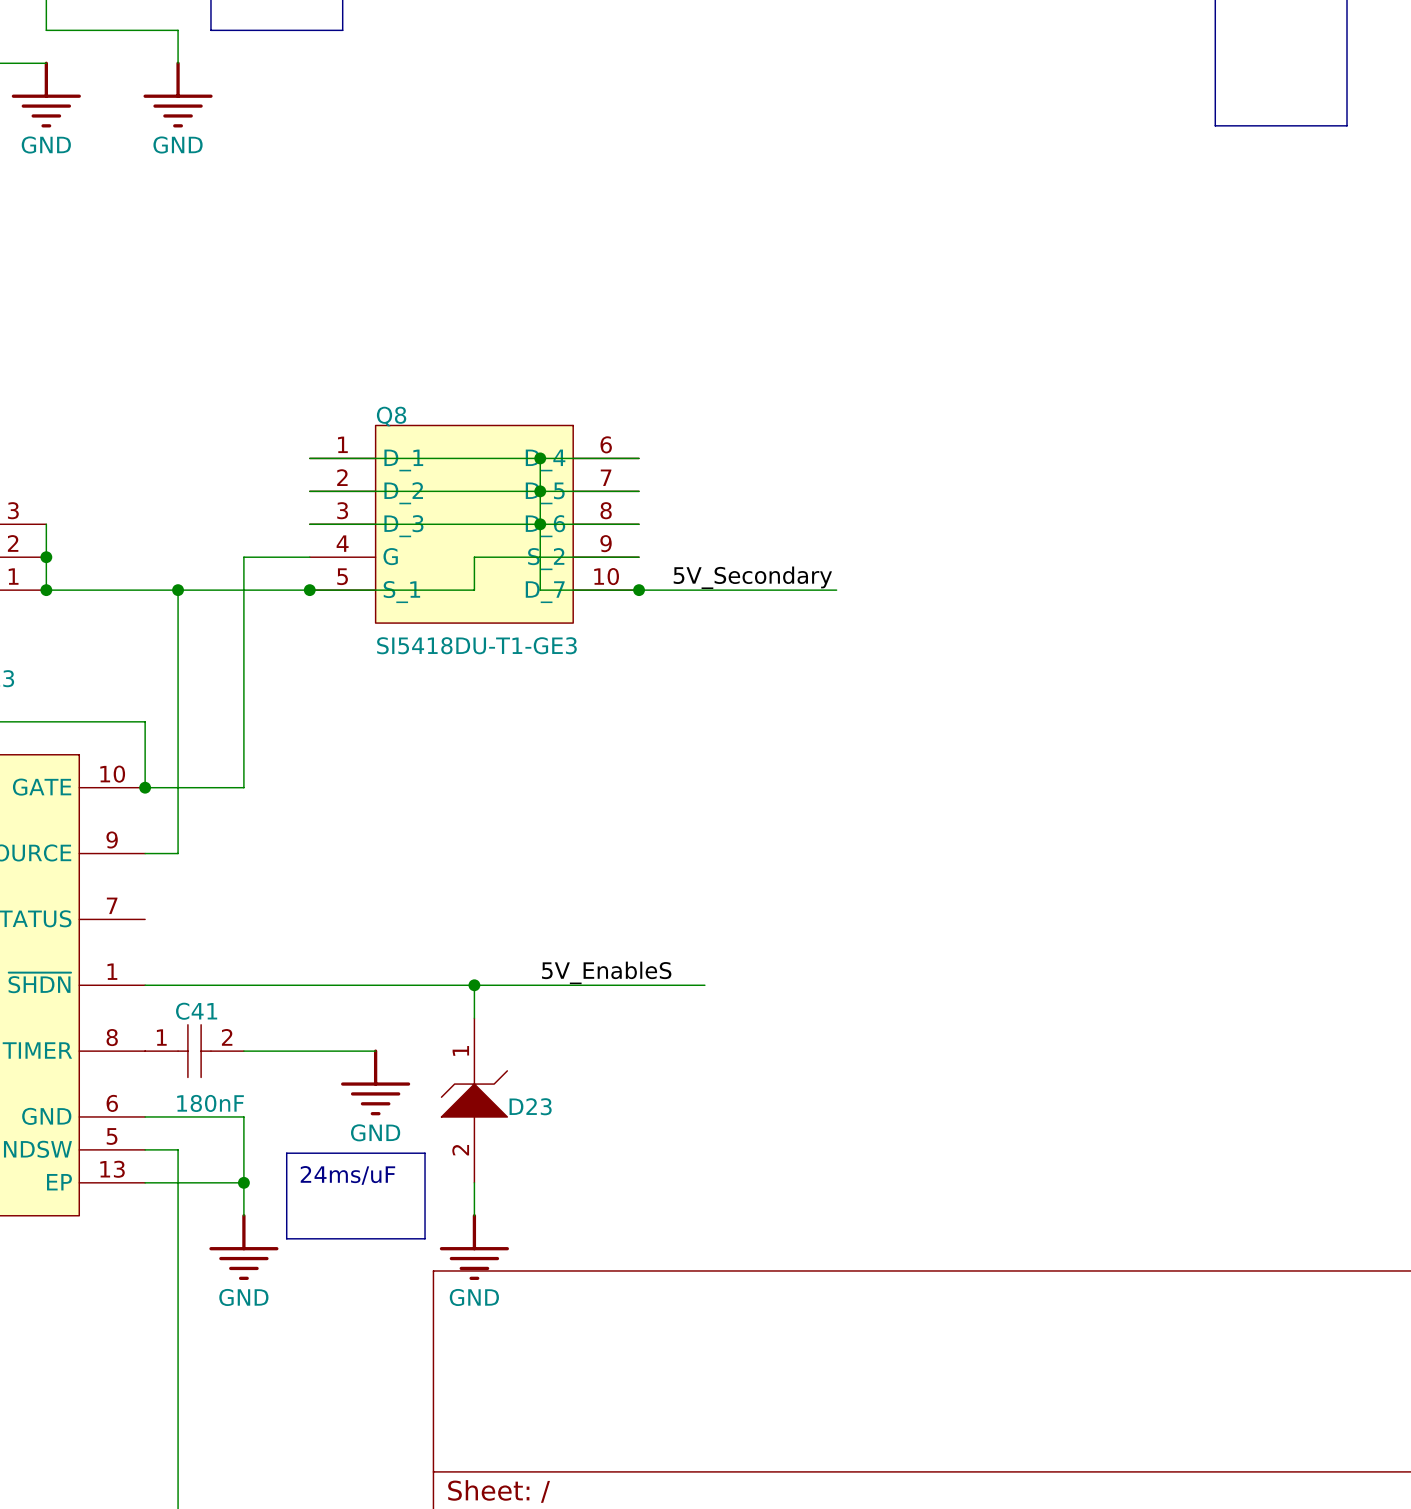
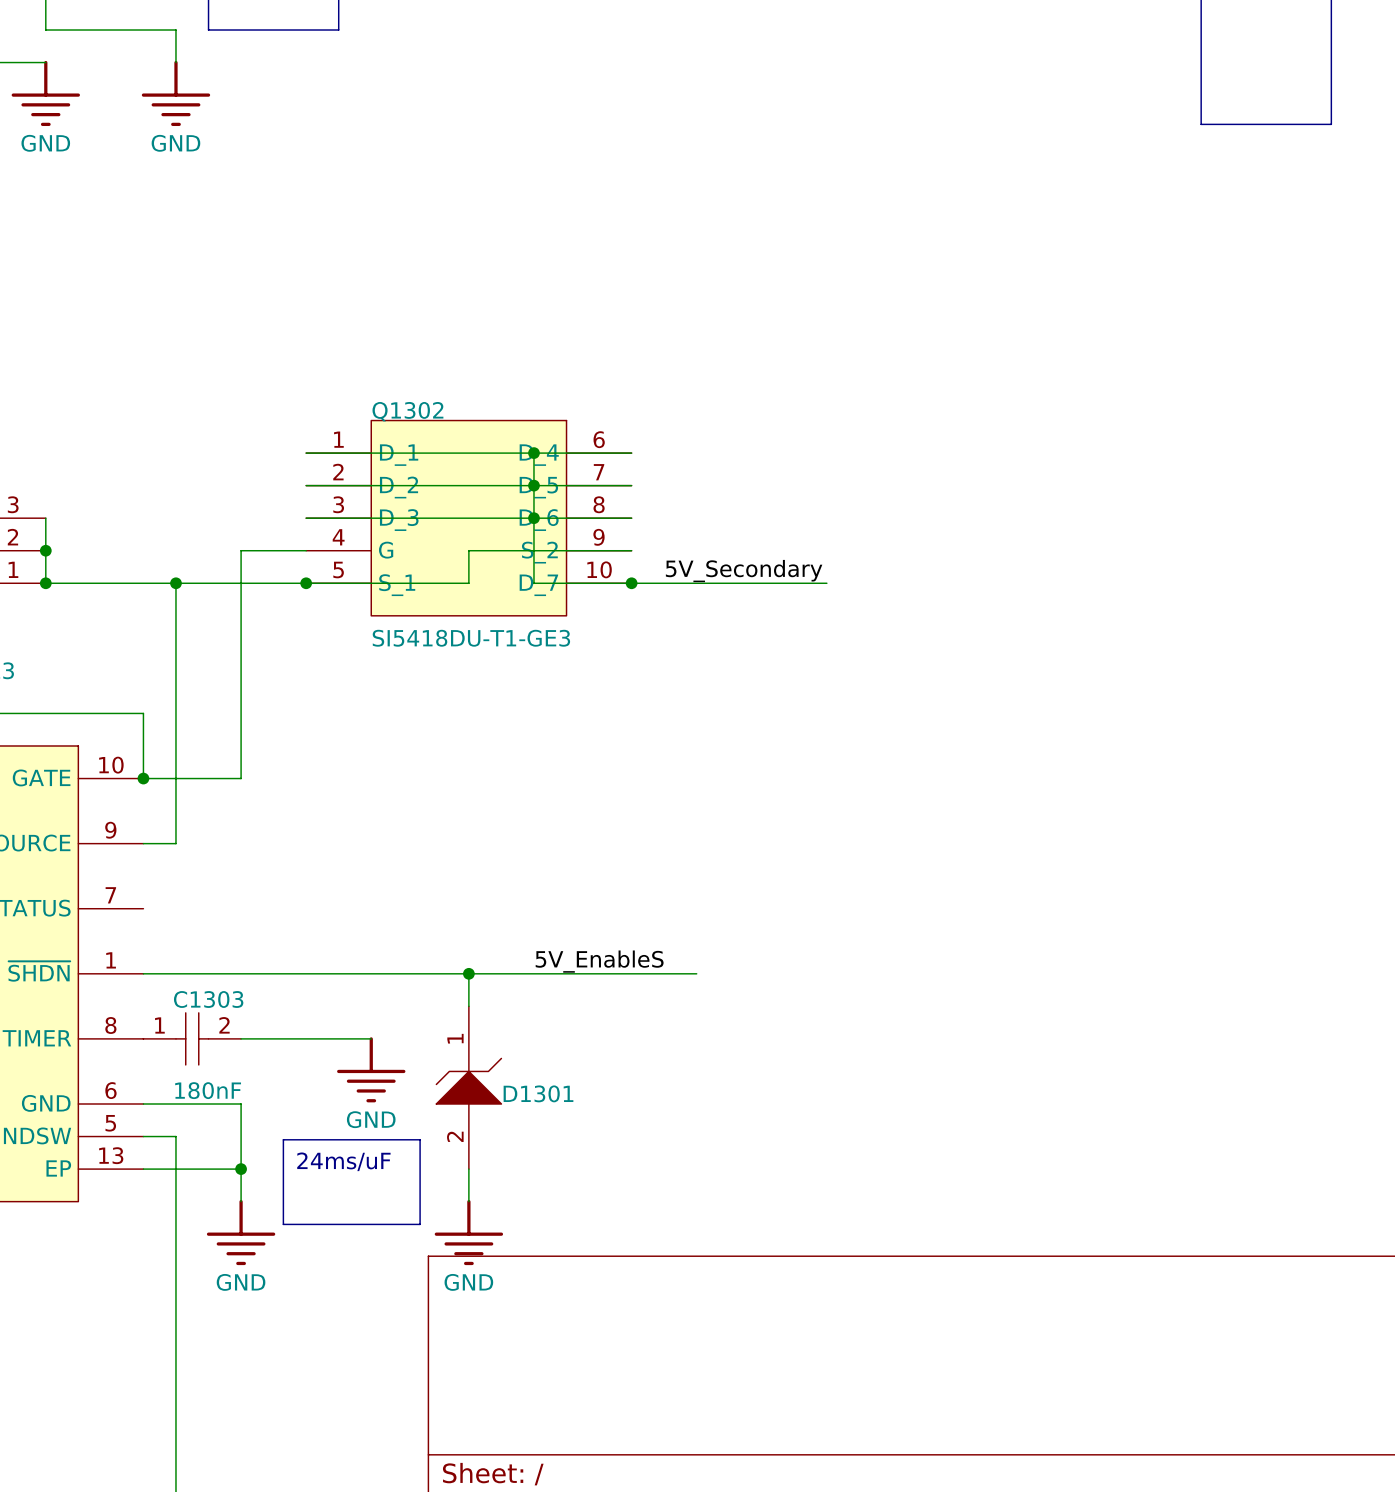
Q8 name: Q8 (391, 416) -> Q1302 (407, 411)
C41 name: C41 (196, 1011) -> C1303 (208, 999)
D23 name: D23 (530, 1106) -> D1301 (538, 1093)

